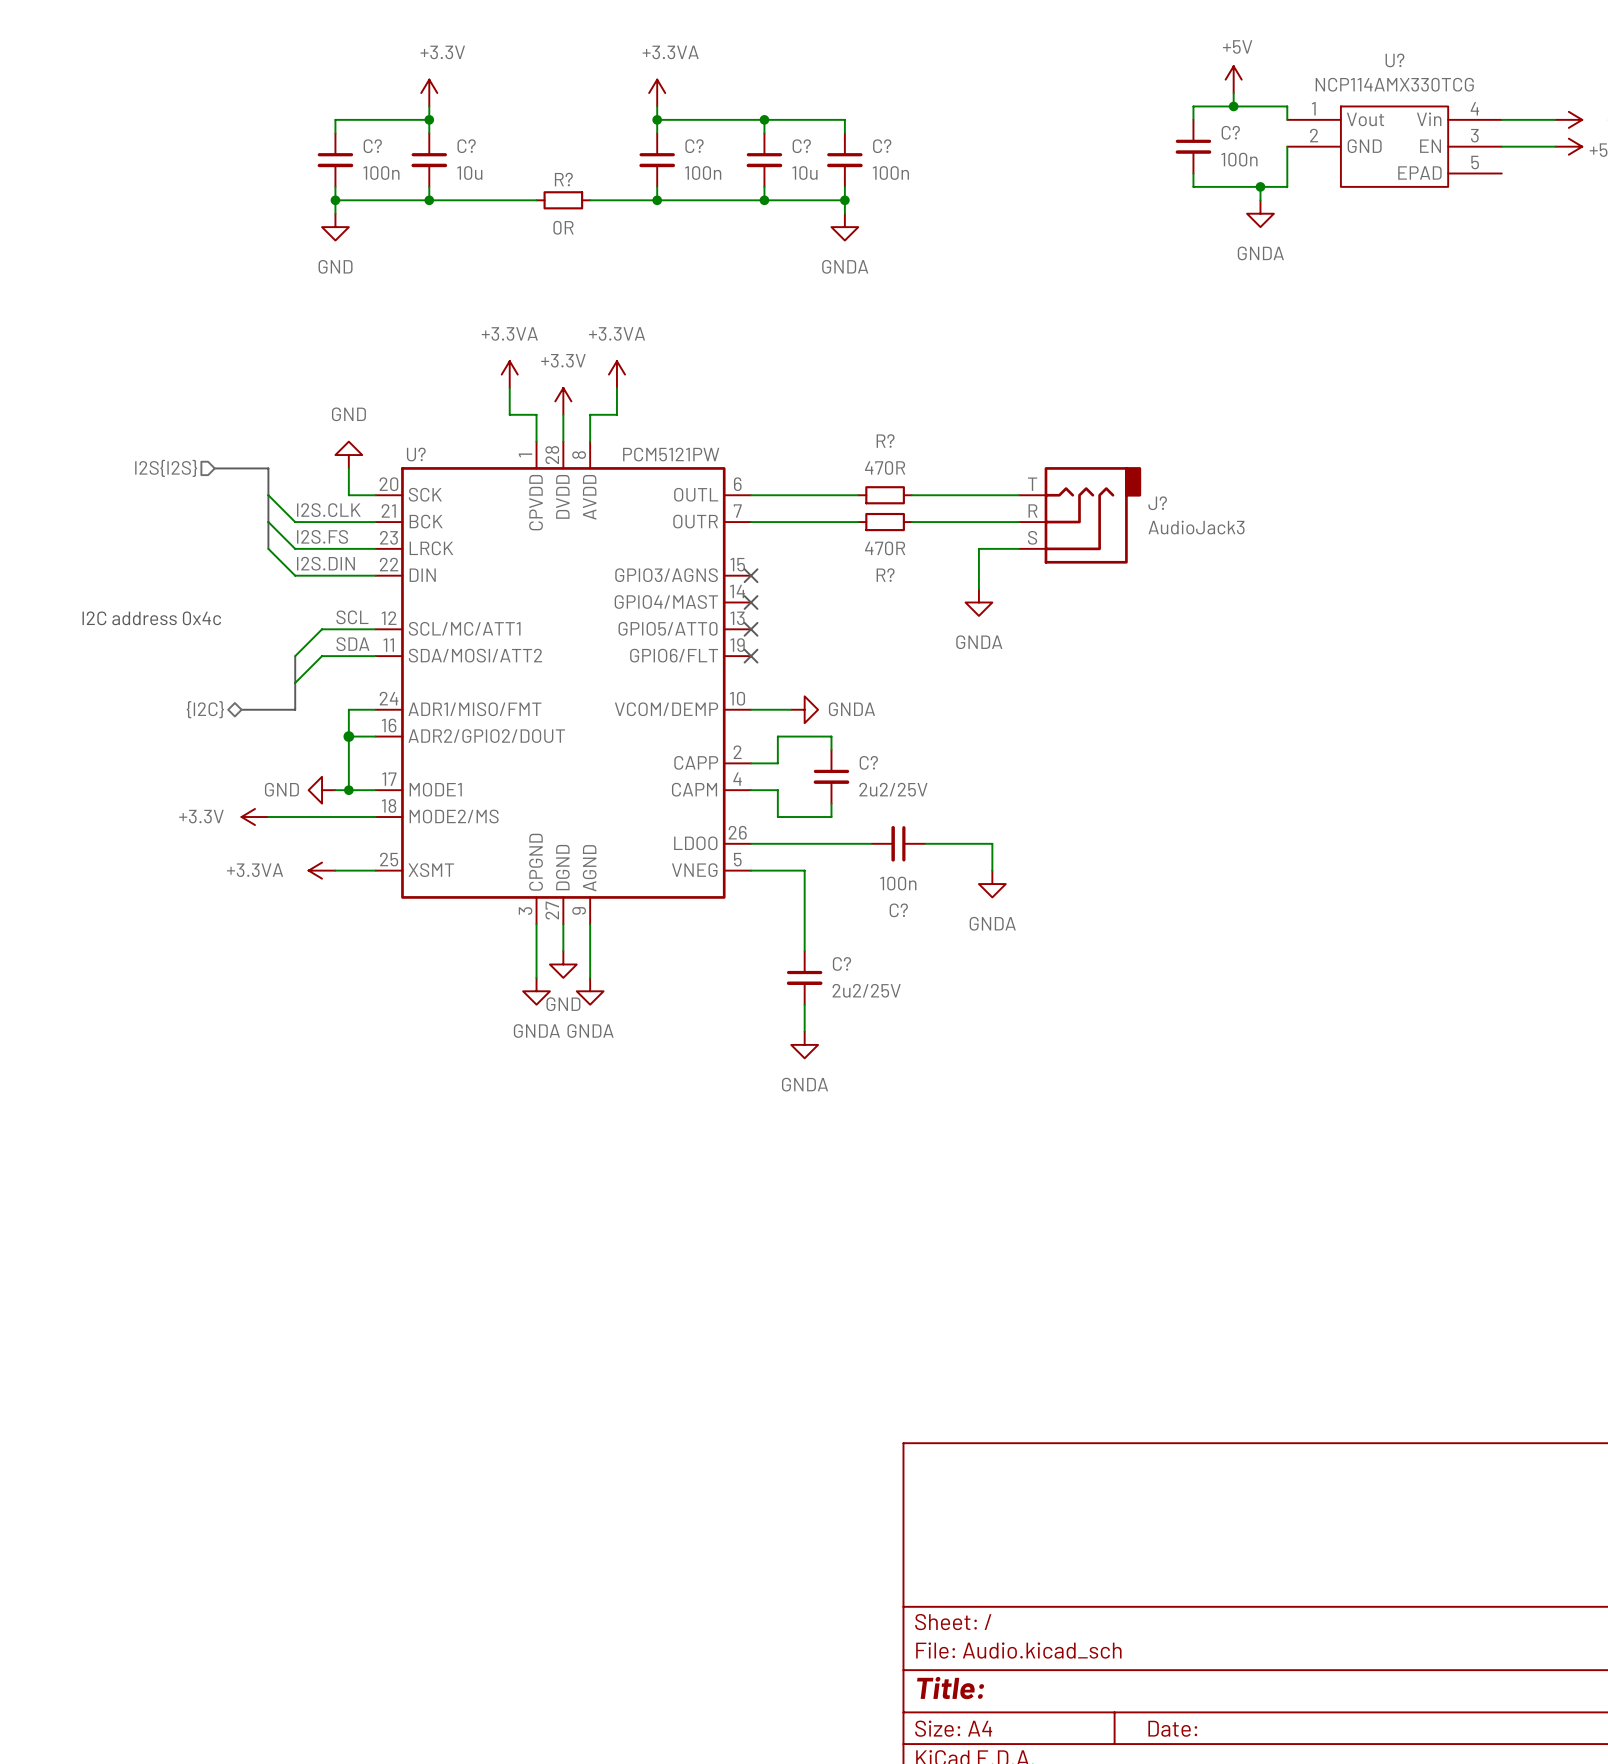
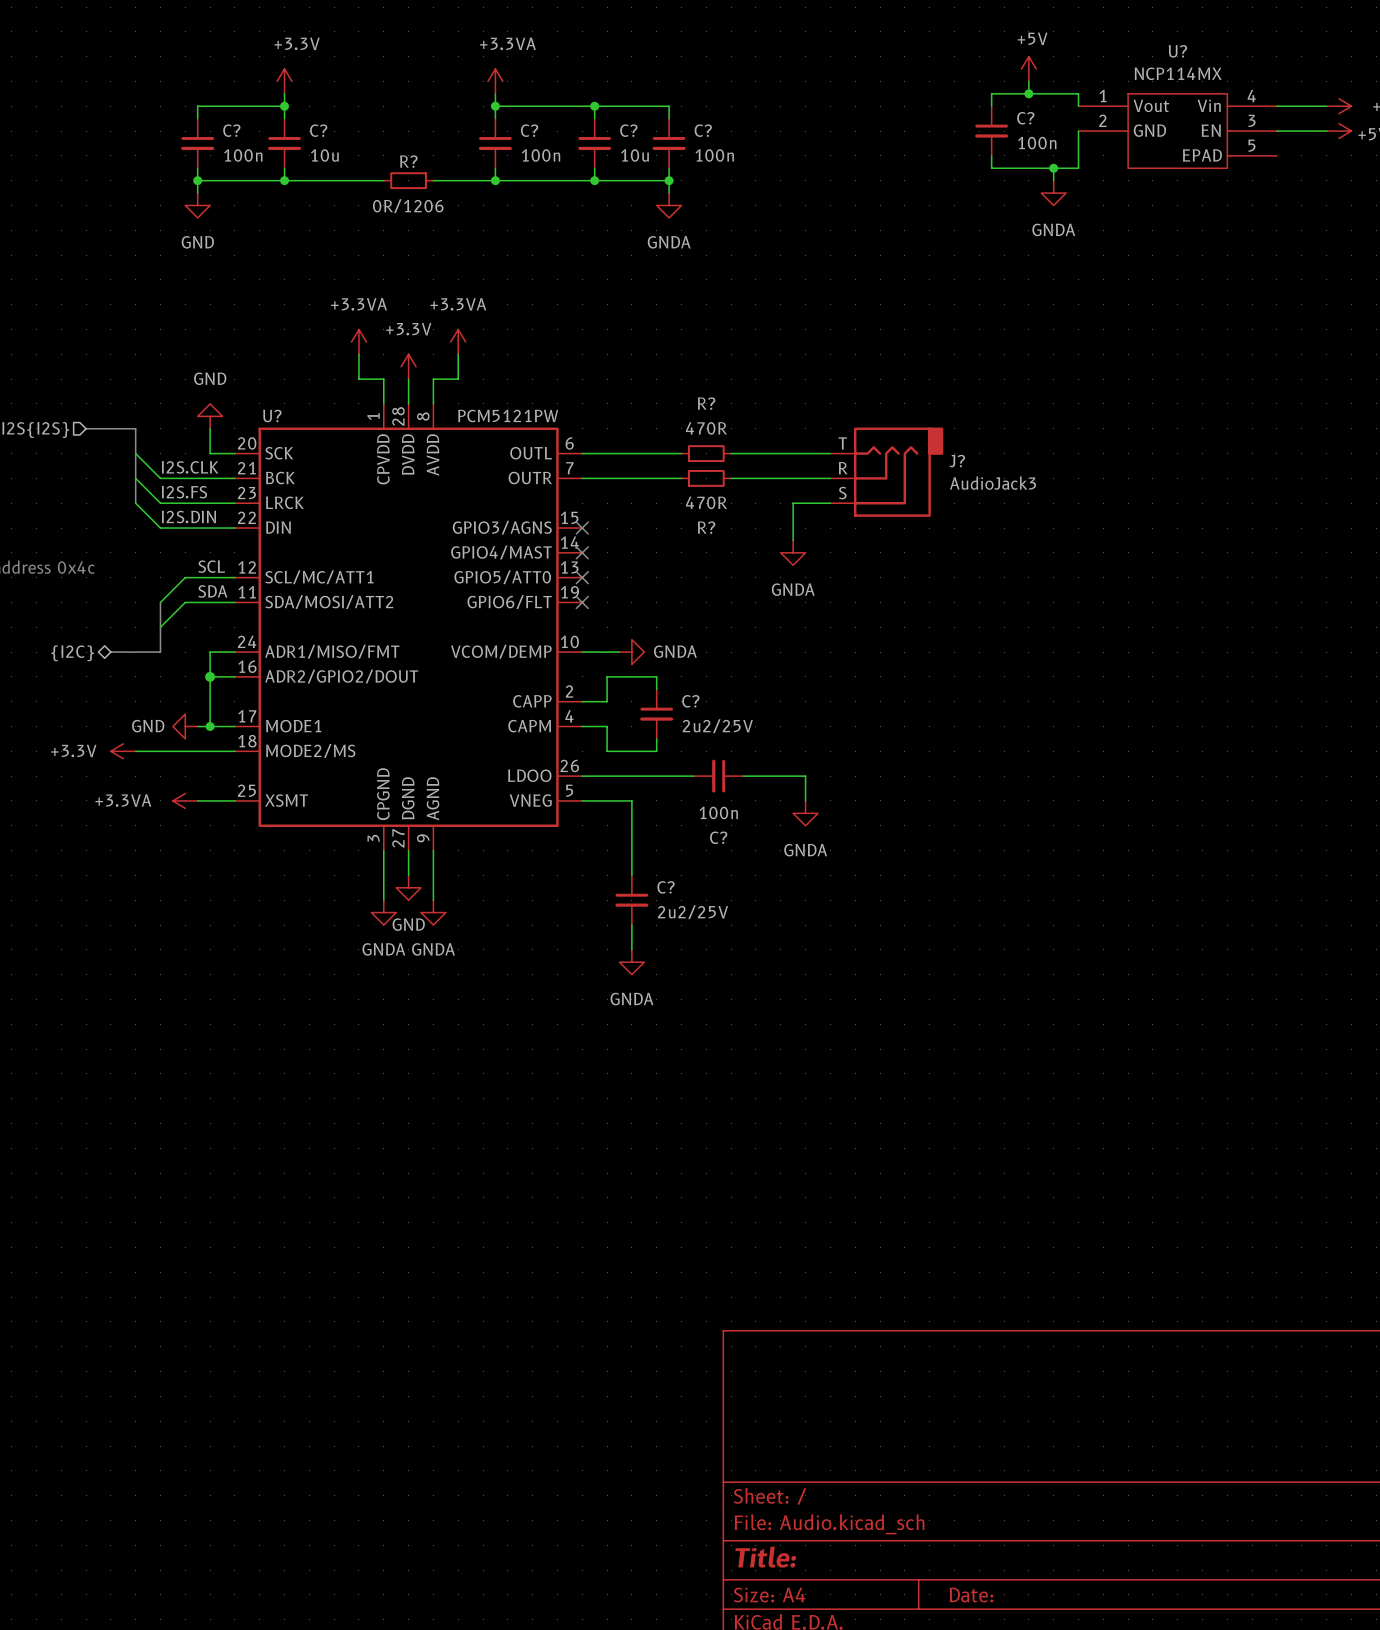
U? value: NCP114AMX330TCG (1394, 84) -> NCP114MX (1178, 73)
R? value: 0R (563, 227) -> 0R/1206 (408, 206)

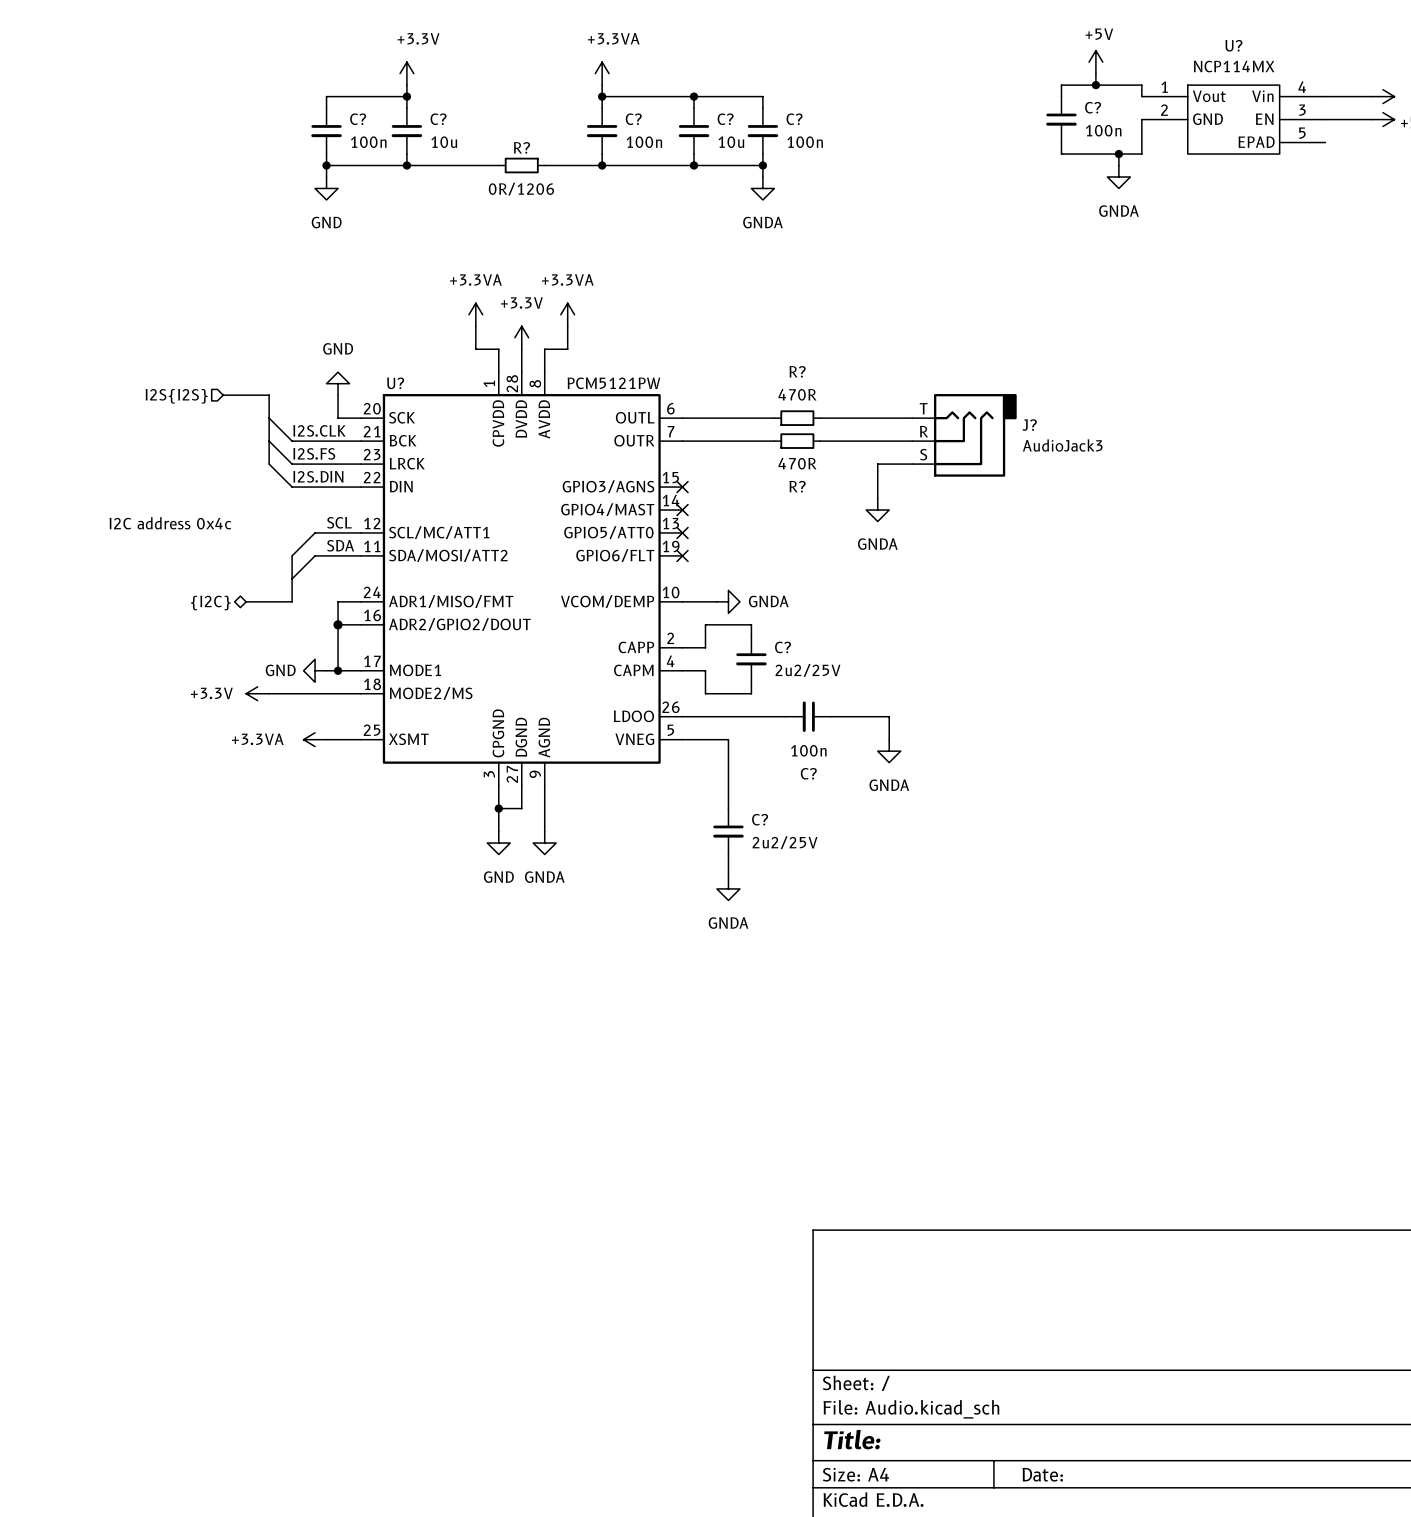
wire: none -> (498, 808) (521, 808)
junction: none -> (498, 808)
power symbol: GND (408, 887) -> none
power symbol: GNDA (383, 912) -> GND (498, 843)

